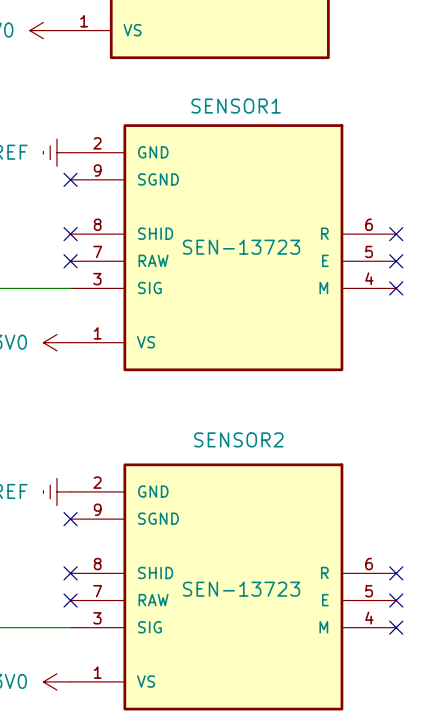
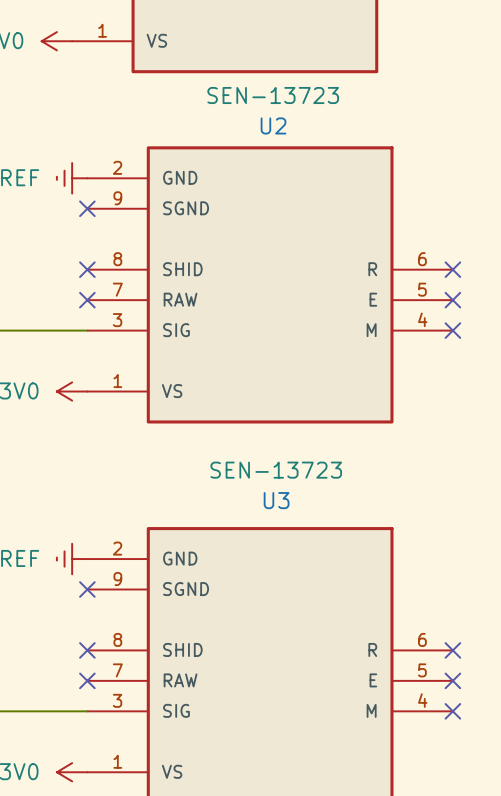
SENSOR1 name: SENSOR1 (236, 106) -> U2 (273, 125)
SENSOR1 value position: SEN-13723 (241, 247) -> SEN-13723 (273, 95)
SENSOR2 name: SENSOR2 (238, 439) -> U3 (276, 500)
SENSOR2 value position: SEN-13723 (241, 589) -> SEN-13723 (276, 470)

